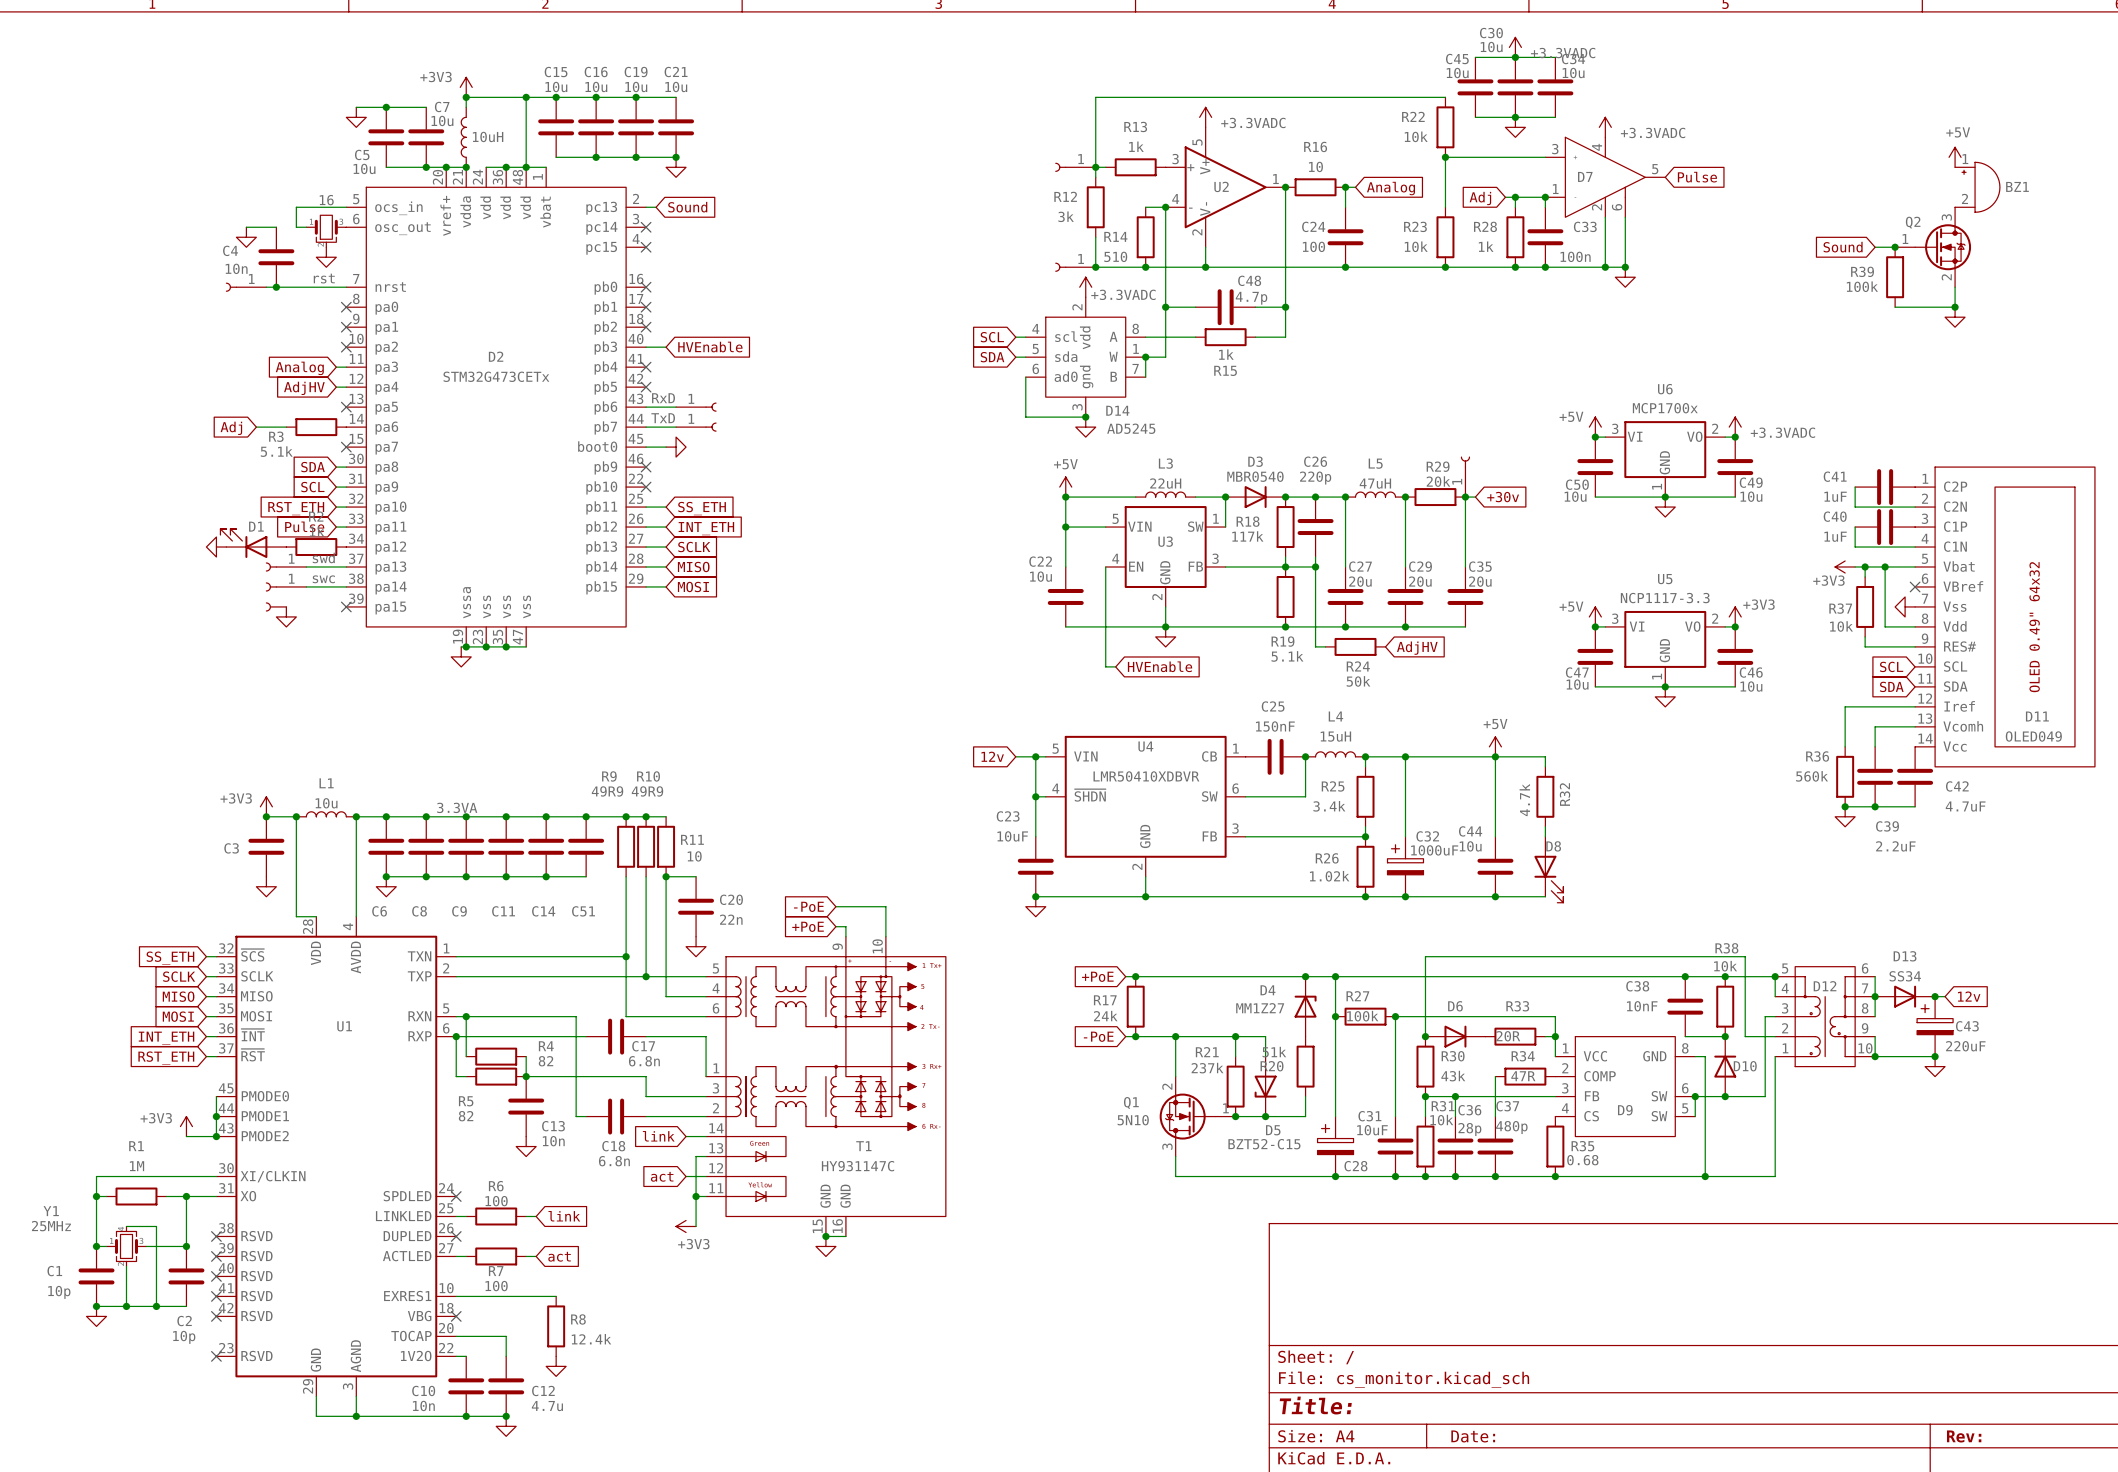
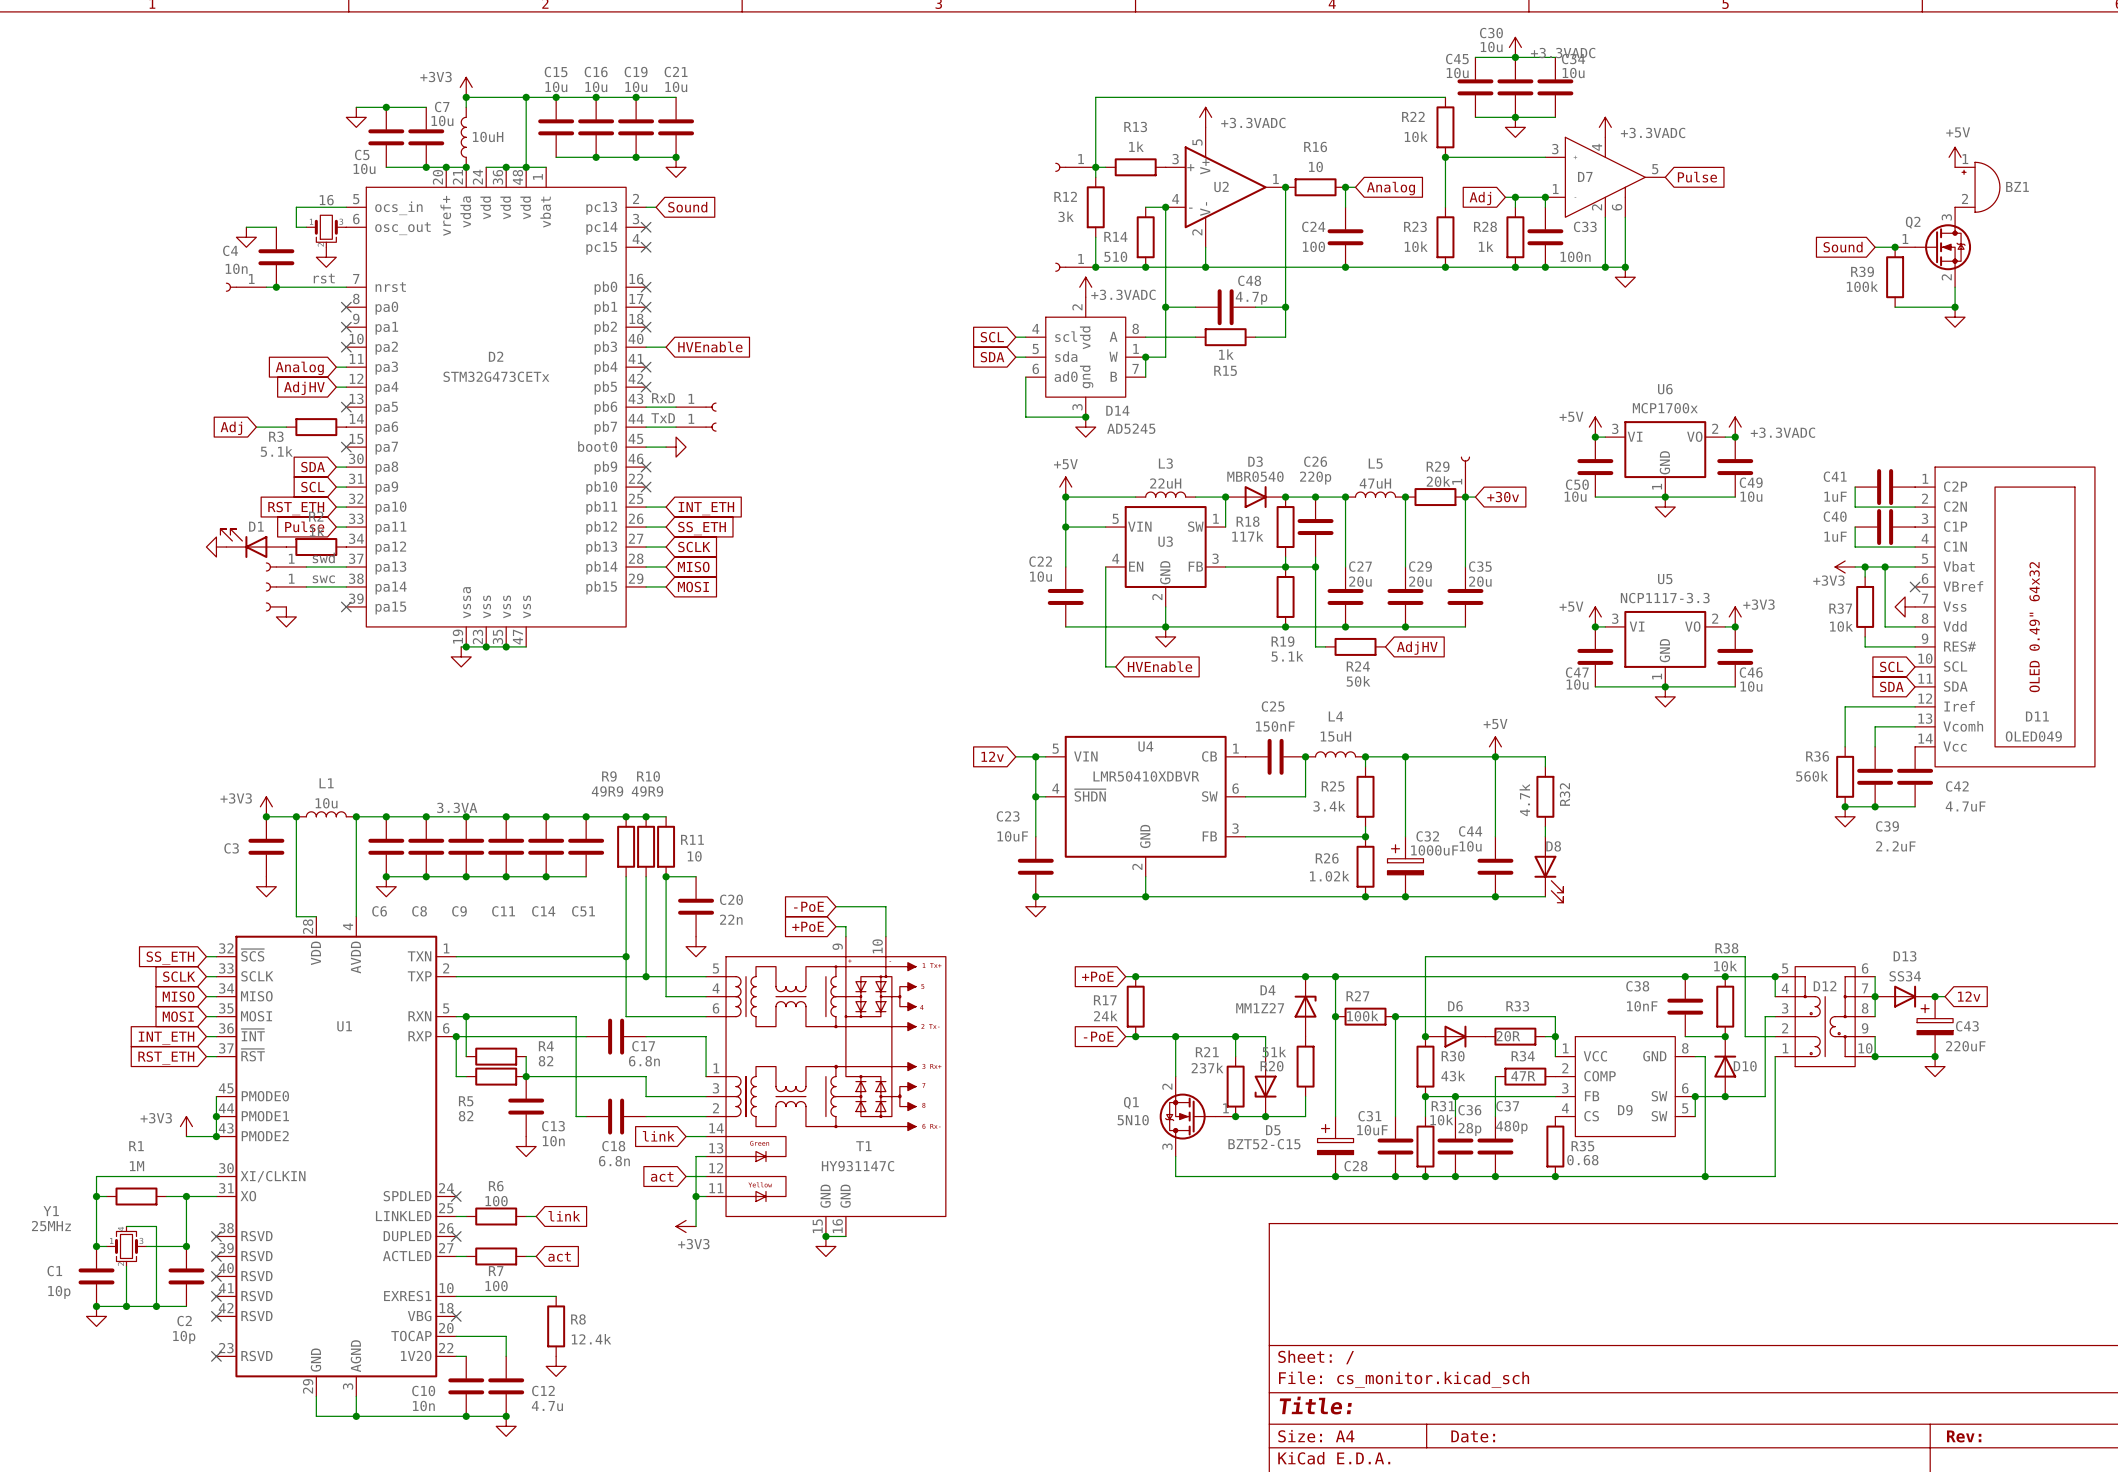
global label: SS_ETH (702, 508) -> INT_ETH (706, 508)
global label: INT_ETH (706, 528) -> SS_ETH (702, 528)

